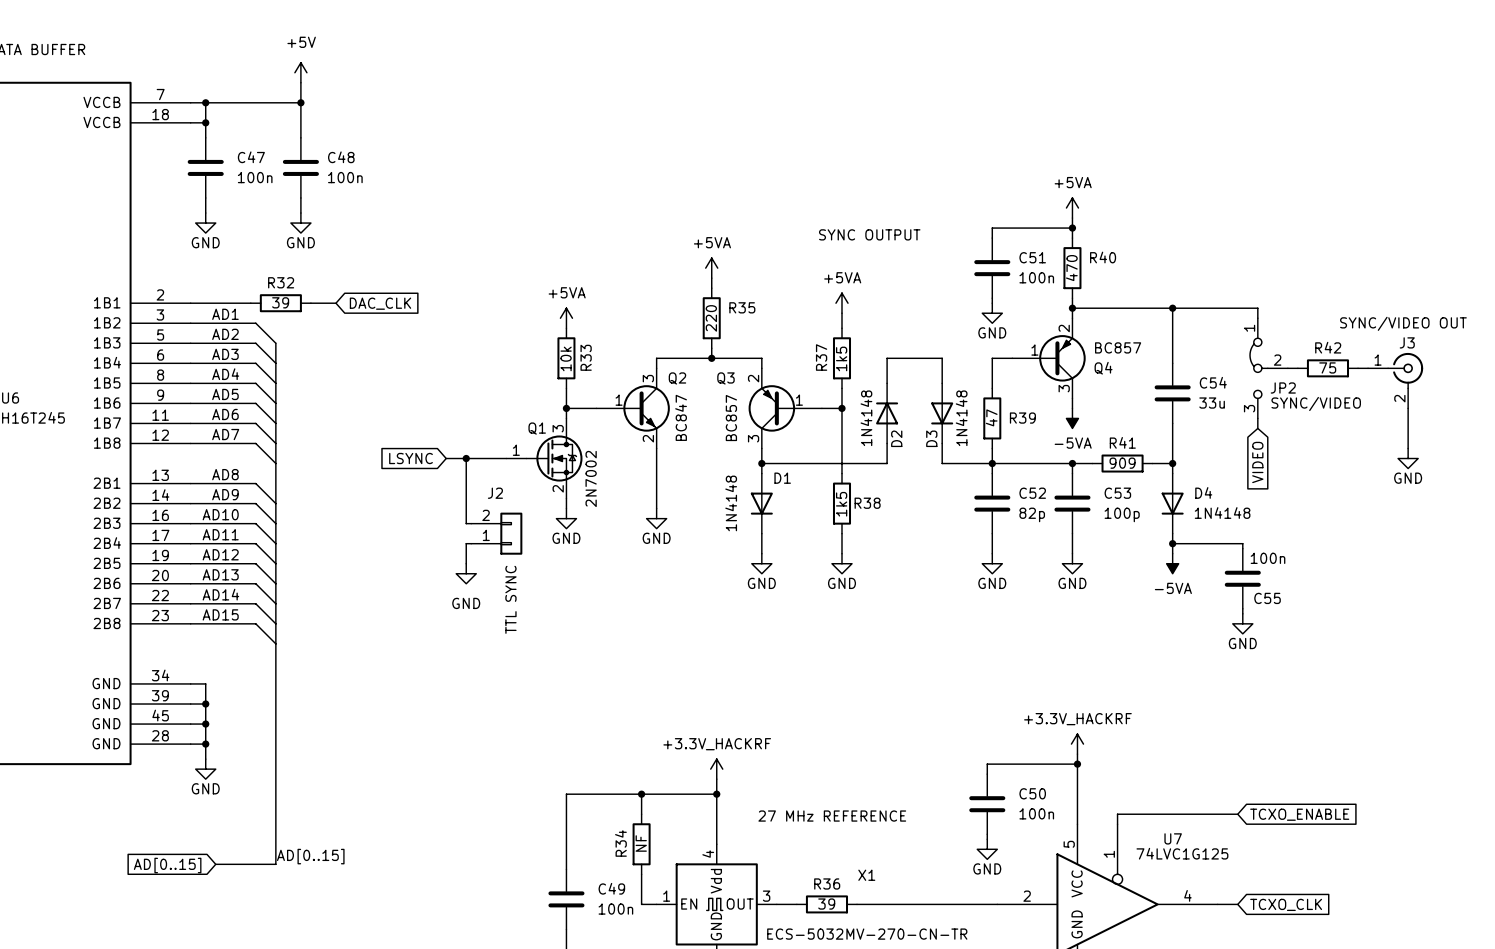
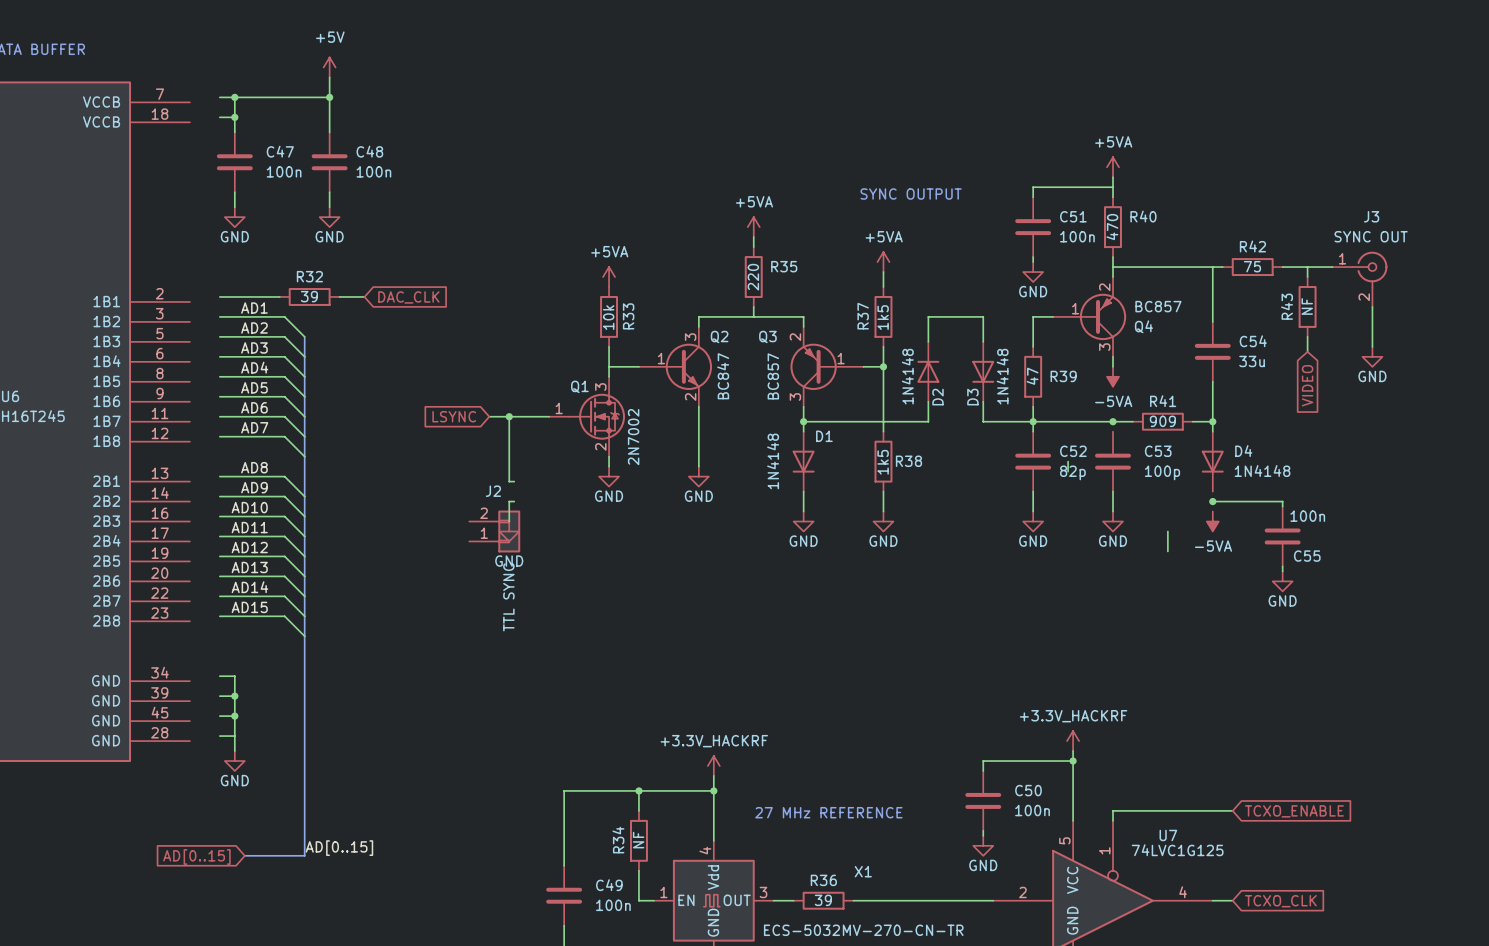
power symbol position: +5V (300, 72) -> +5V (329, 67)
wire: (300, 82) (300, 137) -> (329, 77) (329, 132)
junction: none -> (234, 97)
wire: (190, 102) (300, 102) -> (219, 97) (329, 97)
wire: (205, 102) (205, 137) -> (234, 97) (234, 132)
junction: (205, 102) -> none
junction position: (300, 102) -> (329, 97)
junction: none -> (234, 117)
wire: (190, 122) (205, 122) -> (219, 117) (234, 117)
junction: (205, 122) -> none
C47 position: (205, 167) -> (234, 162)
C48 position: (300, 167) -> (329, 162)
wire: (205, 197) (205, 213) -> (234, 192) (234, 207)
wire: (300, 197) (300, 213) -> (329, 192) (329, 207)
power symbol position: +5VA (1072, 208) -> +5VA (1112, 167)
wire: (1072, 218) (1072, 238) -> (1112, 177) (1112, 197)
power symbol position: GND (205, 223) -> GND (234, 217)
power symbol position: GND (300, 223) -> GND (329, 217)
power symbol: none -> +5VA (753, 227)
wire: (1072, 228) (992, 228) (992, 238) -> (1112, 187) (1033, 187) (1033, 197)
junction: (1072, 228) -> none
text position: SYNC OUTPUT (869, 234) -> SYNC OUTPUT (911, 194)
power symbol: none -> +5VA (883, 262)
power symbol: +5VA (711, 268) -> none
C51 position: (992, 268) -> (1033, 227)
R40 position: (1072, 268) -> (1112, 227)
wire: none -> (1112, 267) (1222, 267)
wire: none -> (1282, 267) (1332, 267)
power symbol: none -> +5VA (609, 277)
wire: (711, 278) (711, 288) -> (753, 237) (753, 247)
wire: (992, 298) (992, 303) -> (1033, 257) (1033, 262)
wire: (1072, 298) (1072, 318) -> (1112, 257) (1112, 277)
wire: (190, 303) (250, 303) -> (219, 296) (279, 296)
R32 position: (280, 303) -> (309, 296)
wire: (310, 303) (335, 303) -> (339, 296) (364, 296)
global label position: DAC_CLK (380, 303) -> DAC_CLK (408, 297)
power symbol: +5VA (841, 303) -> none
wire: (1072, 308) (1257, 308) (1257, 318) -> none
junction: (1072, 308) -> none
wire: (1172, 308) (1172, 363) -> (1212, 267) (1212, 321)
junction: (1172, 308) -> none
R43: none -> NF (1307, 306)
wire: (841, 313) (841, 328) -> (883, 272) (883, 287)
power symbol position: GND (992, 313) -> GND (1033, 272)
label position: AD1 (225, 314) -> AD1 (254, 308)
power symbol: +5VA (566, 318) -> none
R35 position: (711, 318) -> (753, 277)
wire: (190, 323) (255, 323) (275, 343) -> (219, 316) (284, 316) (304, 336)
J3 value: SYNC/VIDEO OUT (1403, 323) -> SYNC OUT (1371, 236)
label position: AD2 (225, 334) -> AD2 (254, 327)
wire: none -> (1307, 336) (1307, 351)
J3 name position: J3 (1407, 342) -> J3 (1371, 216)
wire: (190, 343) (255, 343) (275, 363) -> (219, 336) (284, 336) (304, 356)
bus: (275, 343) (275, 864) (215, 864) -> (304, 336) (304, 855) (244, 855)
wire: none -> (928, 341) (928, 316) (983, 316) (983, 341)
wire: (711, 348) (711, 358) -> (753, 306) (753, 316)
label position: AD3 (225, 354) -> AD3 (254, 347)
R33 position: (566, 358) -> (609, 316)
junction: (711, 358) -> none
R37 position: (841, 358) -> (883, 316)
wire: (887, 358) (942, 358) (942, 383) -> (883, 356) (883, 346)
wire: (1012, 358) (992, 358) (992, 388) -> (1053, 316) (1033, 316) (1033, 346)
Q4 position: (1049, 358) -> (1089, 316)
power symbol: none -> GND (1372, 356)
wire: (190, 363) (255, 363) (275, 383) -> (219, 356) (284, 356) (304, 376)
wire: (656, 368) (656, 358) (761, 358) (761, 368) -> (698, 326) (698, 316) (803, 316) (803, 326)
junction: none -> (883, 366)
JP2: SYNC/VIDEO (1268, 368) -> none
wire: (1287, 368) (1297, 368) -> none
R42 position: (1327, 368) -> (1252, 267)
wire: (1358, 368) (1368, 368) -> none
label position: AD4 (225, 374) -> AD4 (254, 367)
J3 position: (1395, 380) -> (1359, 279)
wire: (190, 383) (255, 383) (275, 403) -> (219, 376) (284, 376) (304, 396)
wire: (566, 388) (566, 418) -> (609, 346) (609, 376)
wire: (841, 388) (841, 473) -> none
C54 position: (1172, 393) -> (1212, 351)
label position: AD5 (225, 394) -> AD5 (254, 387)
wire: (1072, 398) (1072, 408) -> (1112, 356) (1112, 366)
wire: (190, 403) (255, 403) (275, 423) -> (219, 396) (284, 396) (304, 416)
wire: (566, 408) (596, 408) -> (609, 366) (638, 366)
junction: (566, 408) -> none
Q2 position: (633, 408) -> (675, 366)
Q3 position: (785, 408) -> (826, 366)
wire: (821, 408) (841, 408) -> (863, 366) (883, 366)
junction: (841, 408) -> none
wire: (1408, 408) (1408, 448) -> (1372, 306) (1372, 346)
D2 position: (887, 413) -> (928, 371)
D3 position: (942, 413) -> (983, 371)
label position: AD6 (225, 414) -> AD6 (254, 407)
junction: none -> (509, 416)
R39 position: (992, 418) -> (1033, 376)
power symbol position: -5VA (1072, 418) -> -5VA (1112, 376)
wire: (1257, 418) (1257, 428) -> (1307, 267) (1307, 277)
wire: (190, 423) (255, 423) (275, 443) -> (219, 416) (284, 416) (304, 436)
junction: none -> (803, 421)
junction: none -> (1033, 421)
junction: none -> (1112, 421)
wire: (1172, 423) (1172, 473) -> (1212, 381) (1212, 431)
junction: none -> (1212, 421)
label position: AD7 (225, 434) -> AD7 (254, 427)
wire: (190, 443) (255, 443) (275, 463) -> (219, 436) (284, 436) (304, 456)
wire: (887, 443) (887, 463) (761, 463) -> (928, 401) (928, 421) (803, 421)
wire: (942, 443) (942, 463) (1092, 463) -> (983, 401) (983, 421) (1132, 421)
wire: (656, 448) (656, 508) -> (698, 406) (698, 466)
wire: (761, 448) (761, 473) -> (803, 406) (803, 431)
wire: (992, 448) (992, 473) -> (1033, 406) (1033, 431)
global label position: LSYNC (411, 458) -> LSYNC (454, 416)
wire: (446, 458) (506, 458) -> (489, 416) (549, 416)
wire: (466, 458) (466, 523) (471, 523) -> (509, 416) (509, 481) (514, 481)
junction: (466, 458) -> none
Q1 position: (544, 458) -> (587, 416)
power symbol: GND (1408, 458) -> none
global label position: VIDEO (1257, 462) -> VIDEO (1307, 385)
junction: (761, 463) -> none
junction: (992, 463) -> none
junction: (1072, 463) -> none
R41 position: (1122, 463) -> (1162, 421)
wire: (1152, 463) (1172, 463) -> (1192, 421) (1212, 421)
junction: (1172, 463) -> none
label position: AD8 (225, 474) -> AD8 (254, 467)
power symbol: none -> GND (609, 476)
power symbol: none -> GND (698, 476)
wire: (190, 483) (255, 483) (275, 503) -> (219, 476) (284, 476) (304, 496)
label position: AD9 (225, 494) -> AD9 (254, 487)
wire: (566, 498) (566, 508) -> (609, 456) (609, 466)
wire: (190, 503) (255, 503) (275, 523) -> (219, 496) (284, 496) (304, 516)
D1 position: (761, 503) -> (803, 461)
R38 position: (841, 503) -> (883, 461)
C52 position: (992, 503) -> (1033, 461)
C53 position: (1072, 503) -> (1112, 461)
D4 position: (1172, 503) -> (1212, 461)
junction: none -> (1212, 501)
label position: AD10 (220, 514) -> AD10 (249, 507)
power symbol: GND (566, 518) -> none
power symbol: GND (656, 518) -> none
wire: (190, 523) (255, 523) (275, 543) -> (219, 516) (284, 516) (304, 536)
power symbol: none -> GND (803, 521)
power symbol: none -> GND (883, 521)
power symbol: none -> GND (1033, 521)
power symbol: none -> GND (1112, 521)
power symbol: none -> GND (509, 531)
wire: (761, 533) (761, 553) -> (803, 491) (803, 511)
wire: (841, 533) (841, 553) -> (883, 491) (883, 511)
wire: (992, 533) (992, 553) -> (1033, 491) (1033, 511)
wire: (1072, 533) (1072, 553) -> (1112, 491) (1112, 511)
label position: AD11 (220, 534) -> AD11 (249, 527)
wire: (190, 543) (255, 543) (275, 563) -> (219, 536) (284, 536) (304, 556)
wire: (471, 543) (466, 543) (466, 563) -> (514, 501) (509, 501) (509, 521)
wire: (1172, 543) (1242, 543) (1242, 548) -> (1212, 501) (1282, 501) (1282, 506)
junction: (1172, 543) -> none
label position: AD12 (220, 554) -> AD12 (249, 547)
wire: (190, 563) (255, 563) (275, 583) -> (219, 556) (284, 556) (304, 576)
power symbol: GND (761, 563) -> none
power symbol: GND (841, 563) -> none
power symbol: GND (992, 563) -> none
power symbol: GND (1072, 563) -> none
power symbol position: -5VA (1172, 563) -> -5VA (1212, 521)
power symbol: GND (466, 573) -> none
label position: AD13 (220, 574) -> AD13 (249, 567)
C55 position: (1242, 578) -> (1282, 536)
wire: (190, 583) (255, 583) (275, 603) -> (219, 576) (284, 576) (304, 596)
label position: AD14 (220, 594) -> AD14 (249, 587)
wire: (190, 603) (255, 603) (275, 623) -> (219, 596) (284, 596) (304, 616)
wire: (1242, 608) (1242, 613) -> (1282, 566) (1282, 571)
label position: AD15 (220, 614) -> AD15 (249, 607)
wire: (190, 623) (255, 623) (275, 643) -> (219, 616) (284, 616) (304, 636)
power symbol position: GND (1242, 623) -> GND (1282, 581)
wire: (190, 683) (205, 683) (205, 759) -> (219, 676) (234, 676) (234, 751)
junction: none -> (234, 696)
wire: (190, 704) (205, 704) -> (219, 696) (234, 696)
junction: (205, 704) -> none
junction: none -> (234, 716)
wire: (190, 724) (205, 724) -> (219, 716) (234, 716)
junction: (205, 724) -> none
wire: (190, 744) (205, 744) -> (219, 736) (234, 736)
junction: (205, 744) -> none
power symbol position: GND (205, 769) -> GND (234, 761)
label position: AD[0..15] (310, 856) -> AD[0..15] (339, 848)
global label position: AD[0..15] (167, 865) -> AD[0..15] (196, 857)

